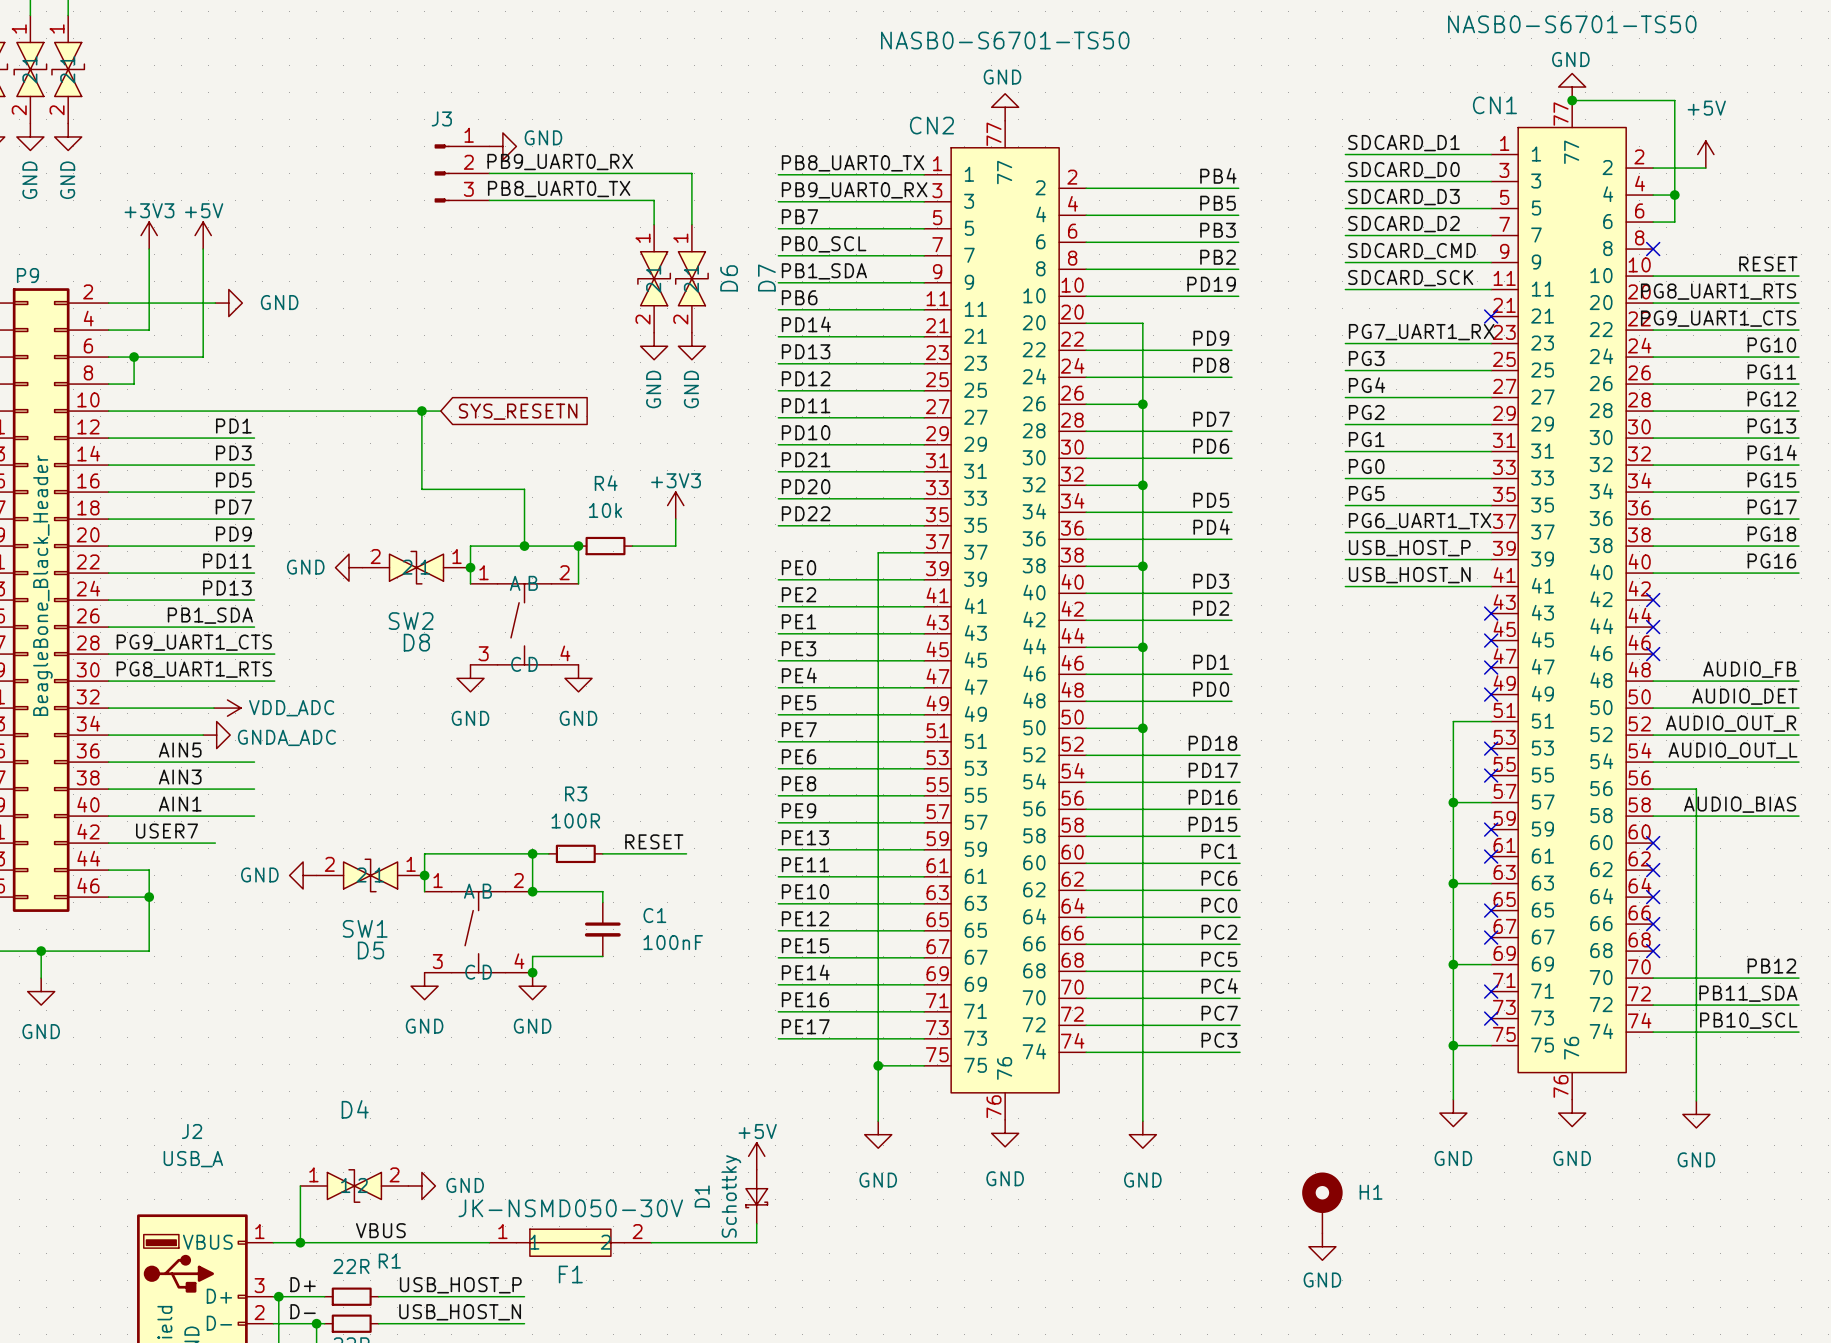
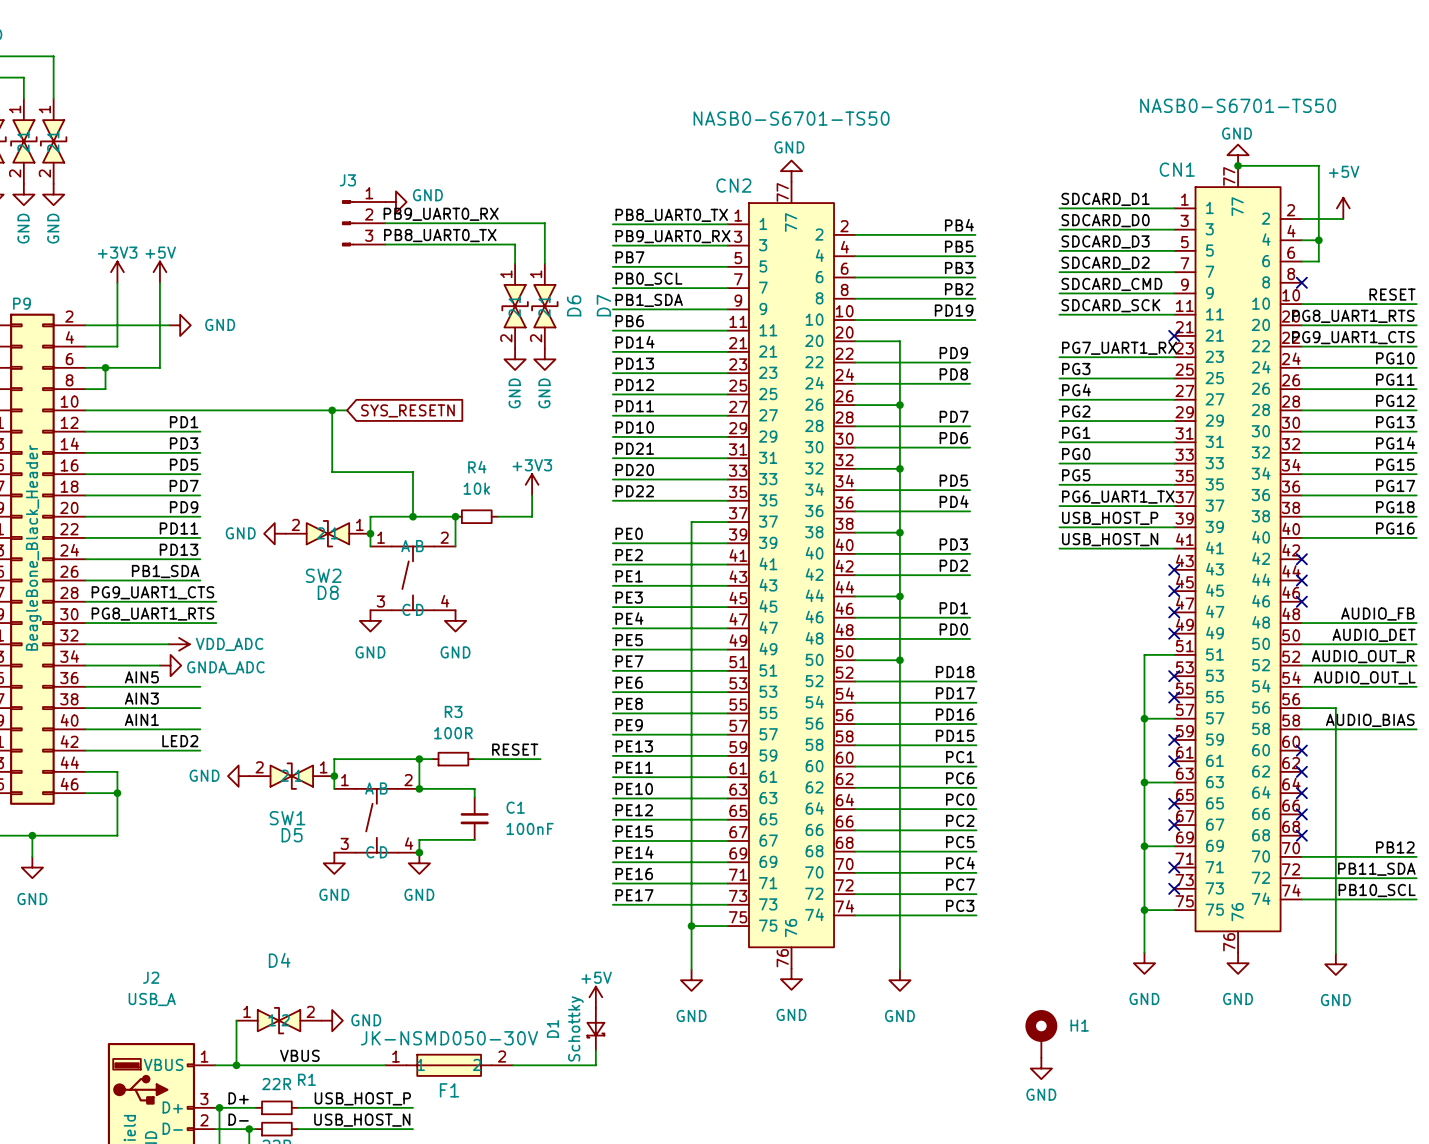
label: USER7 (167, 831) -> none
label: none -> LED2 (180, 741)
wire: none -> (169, 750) (200, 750)

